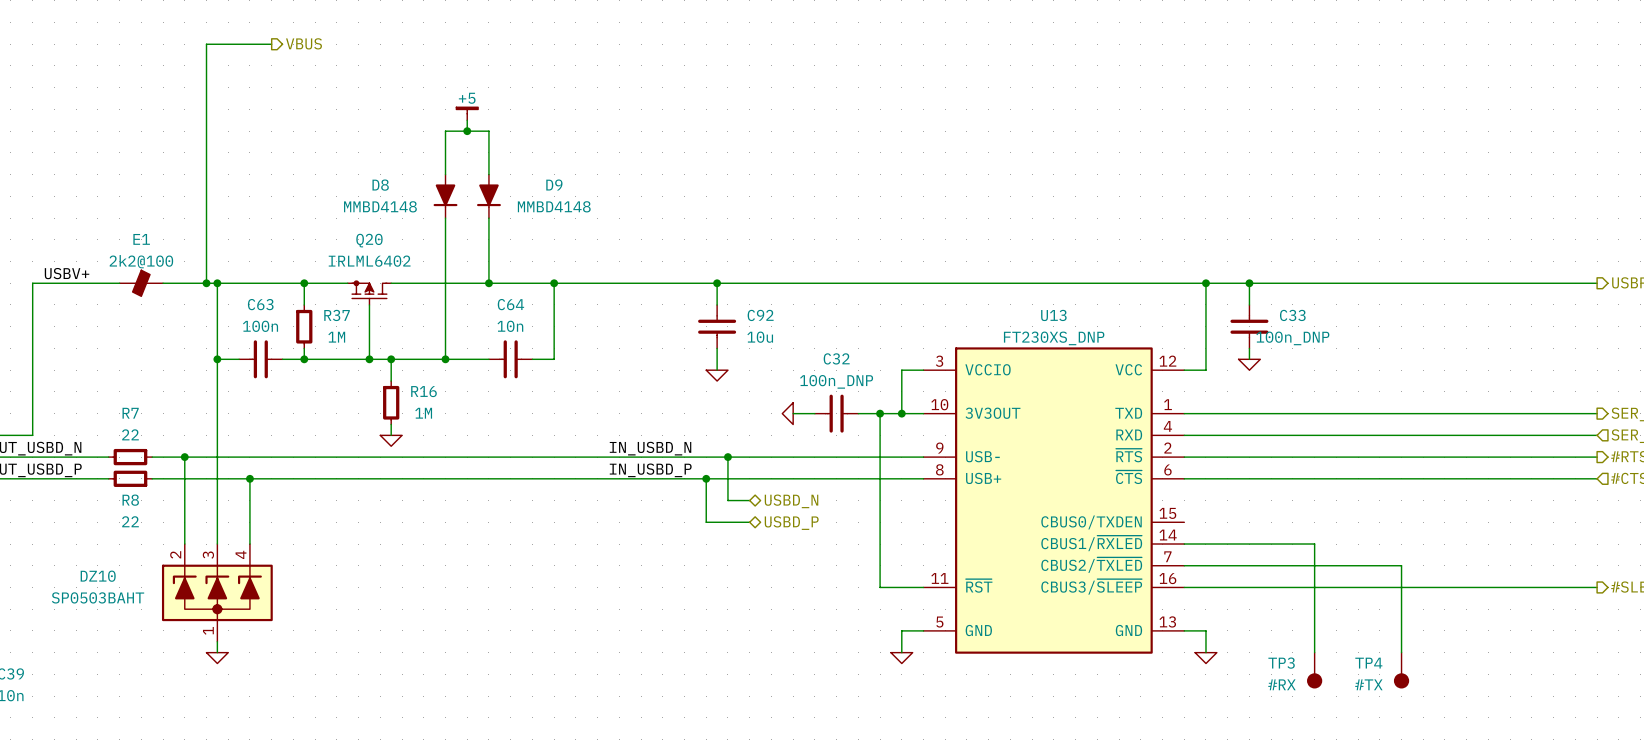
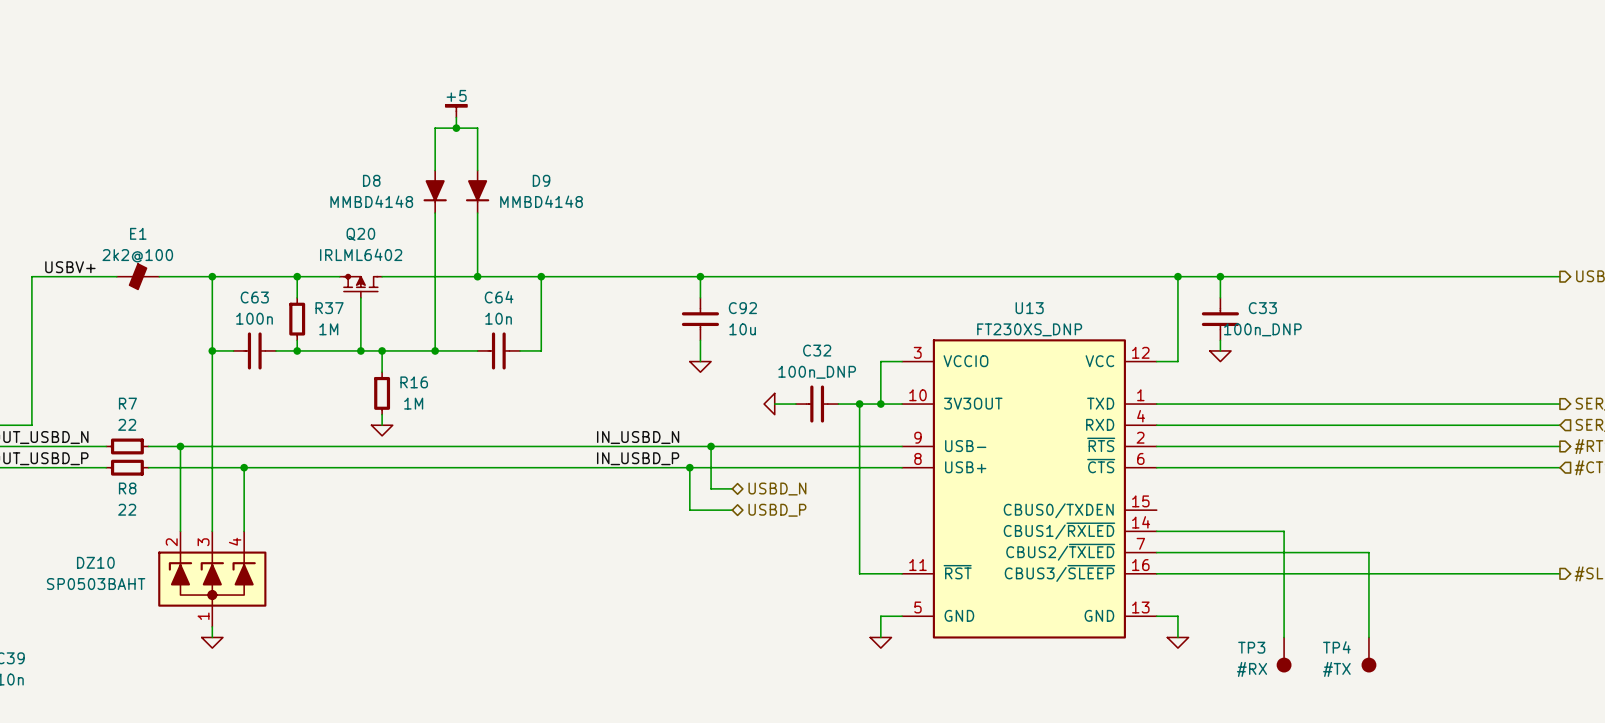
hierarchical label: VBUS (303, 43) -> none
wire: (271, 44) (206, 44) (206, 283) -> none
junction: (206, 283) -> none

